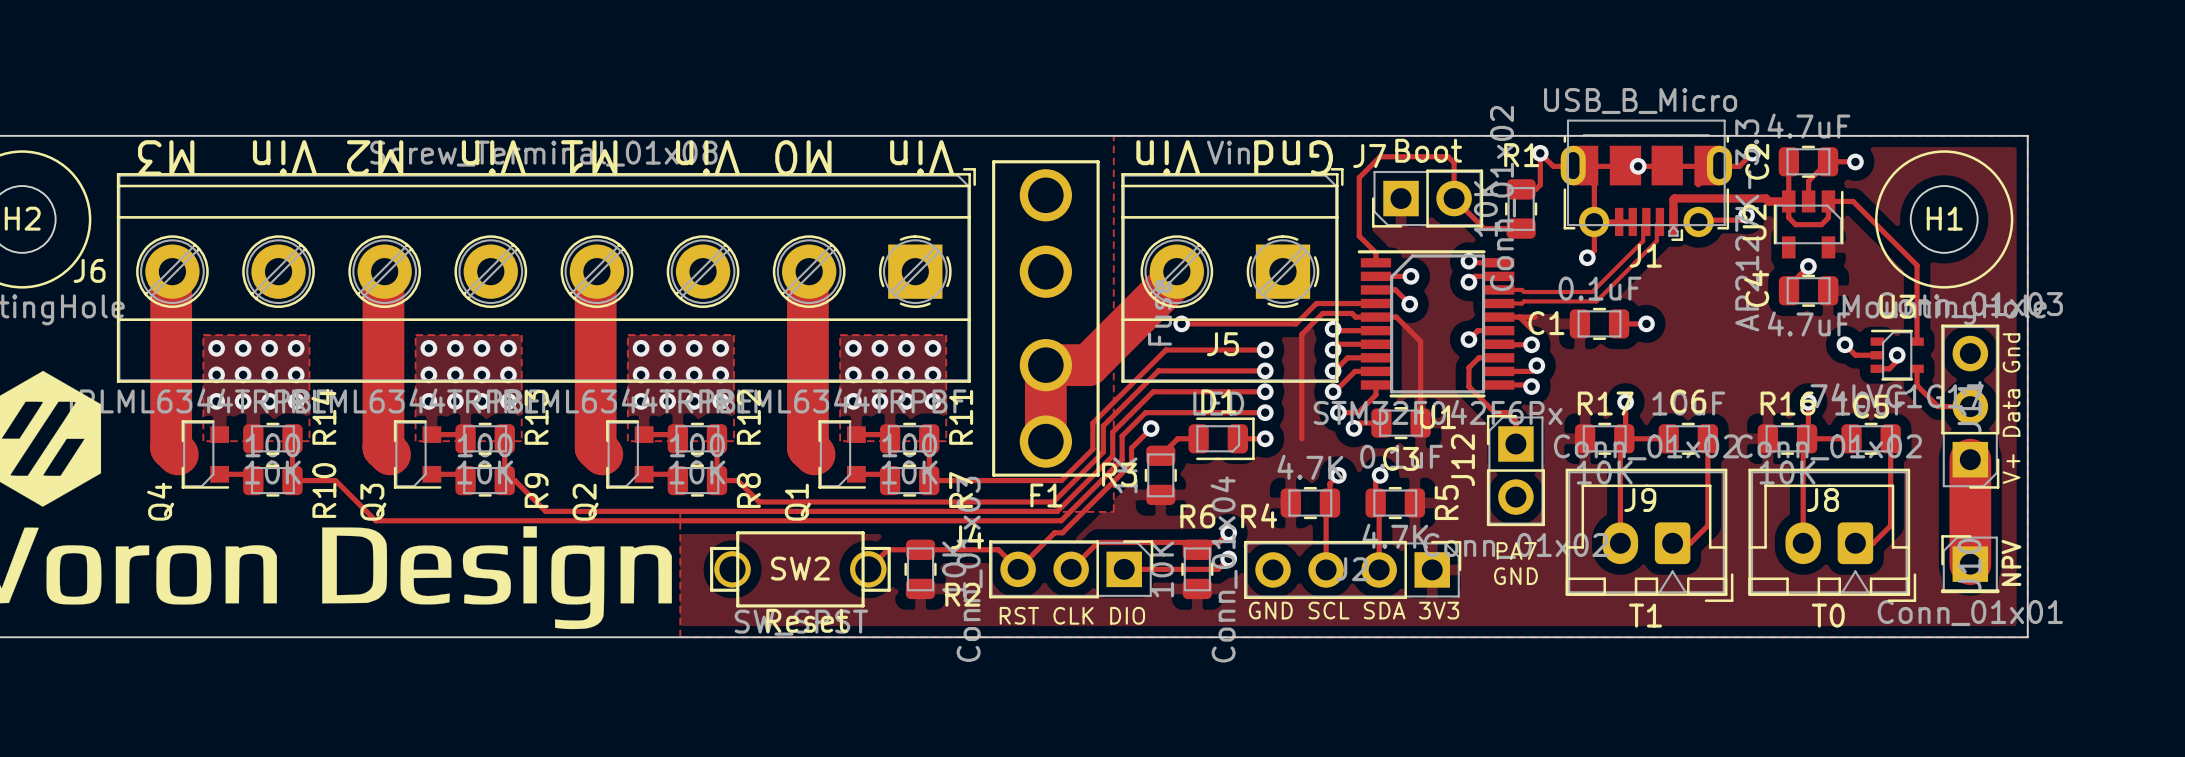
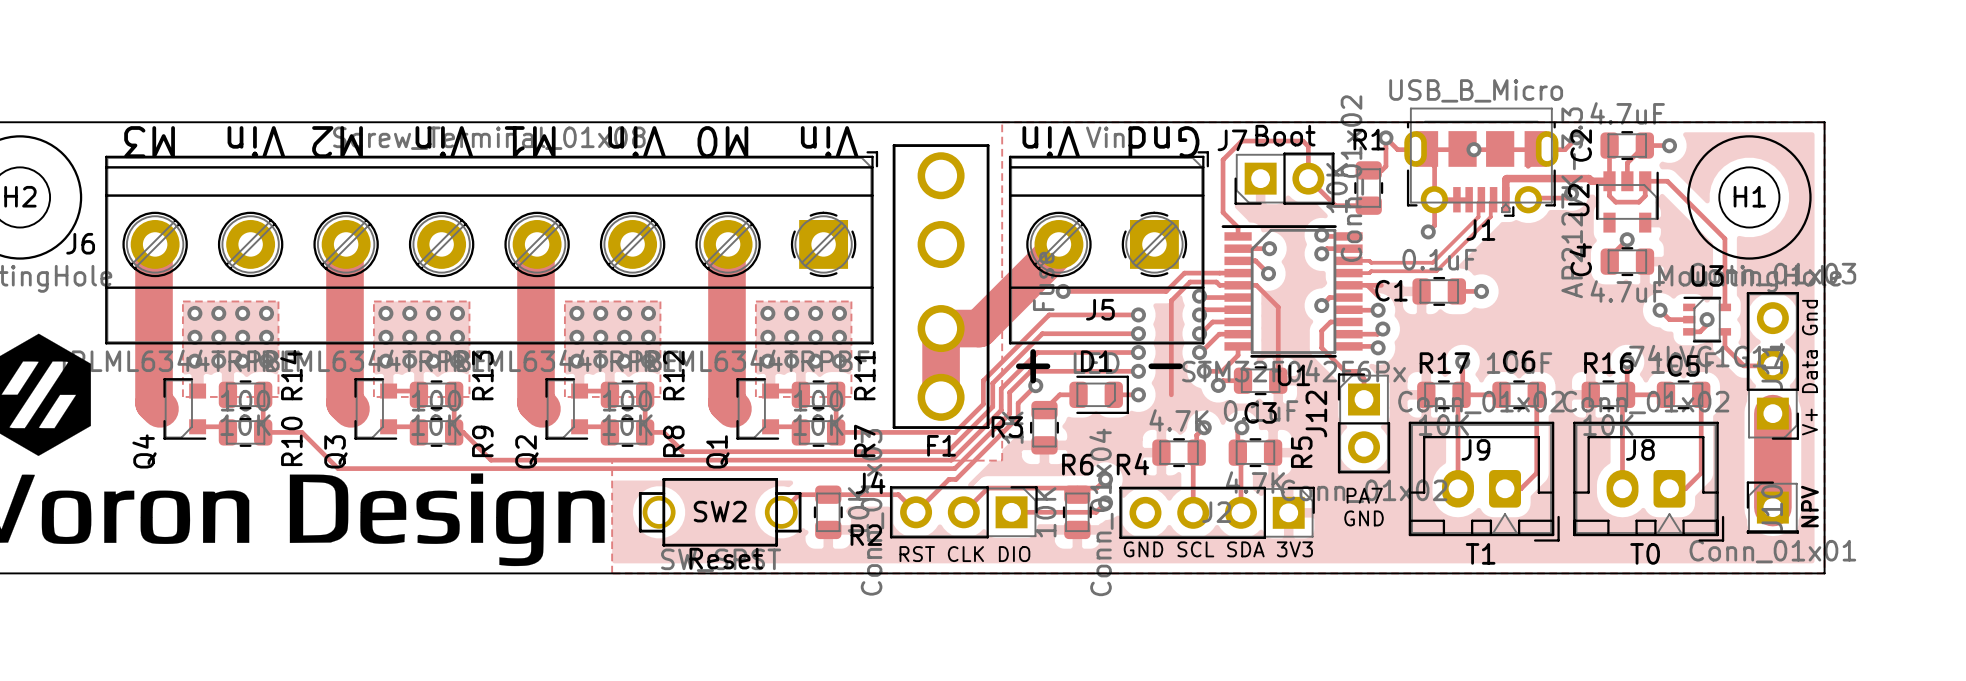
text: none -> + - (1099, 366)

